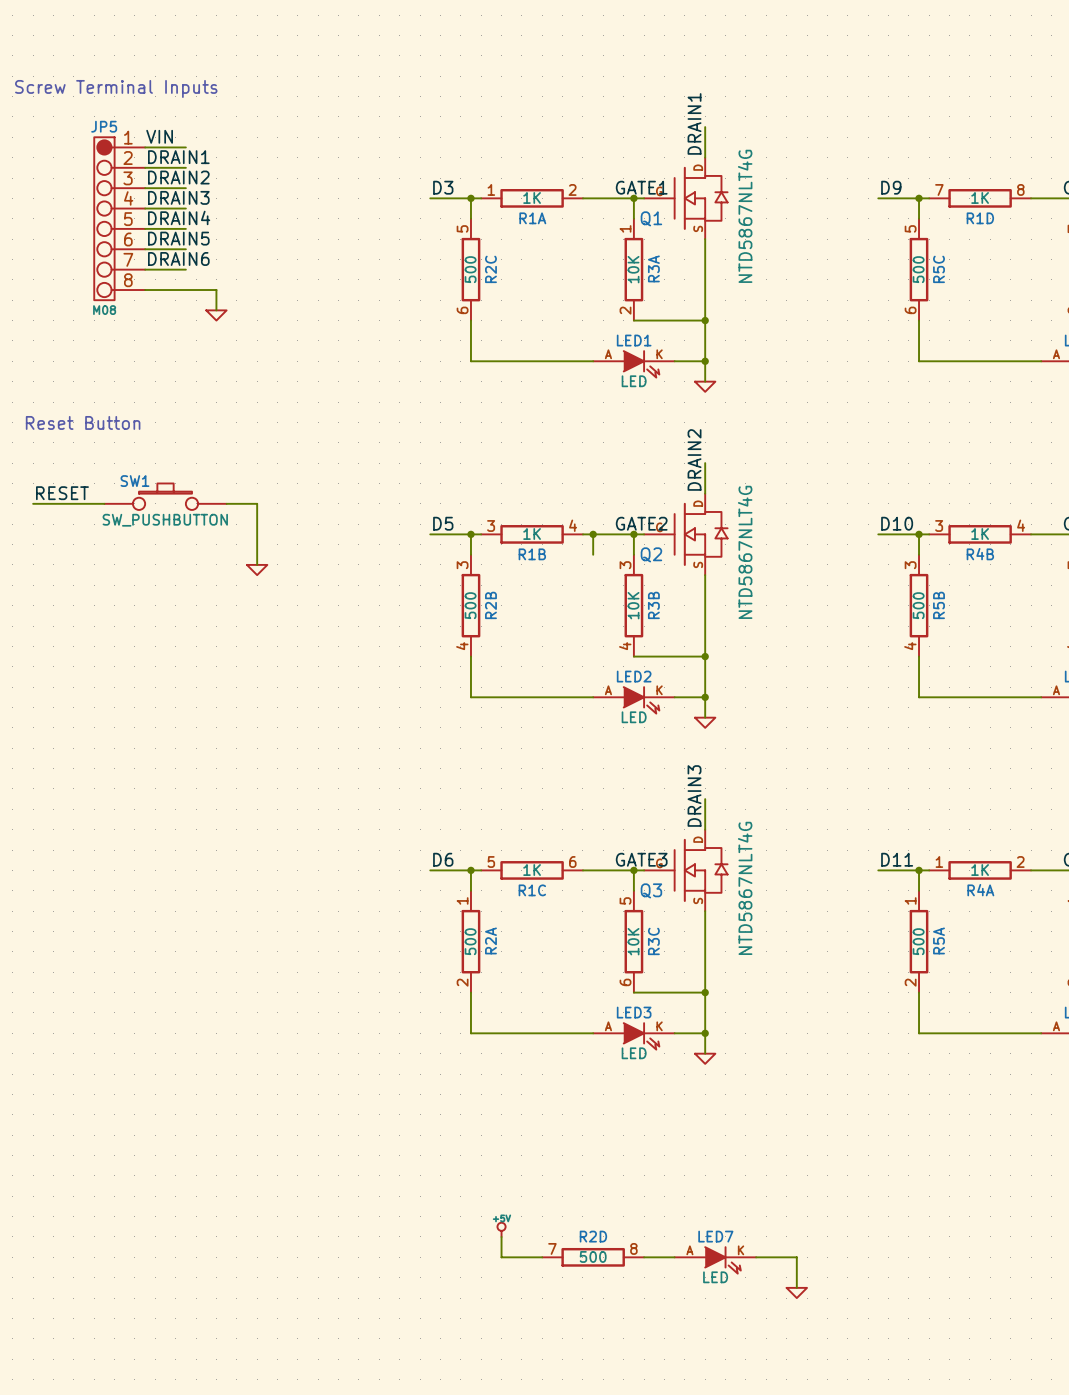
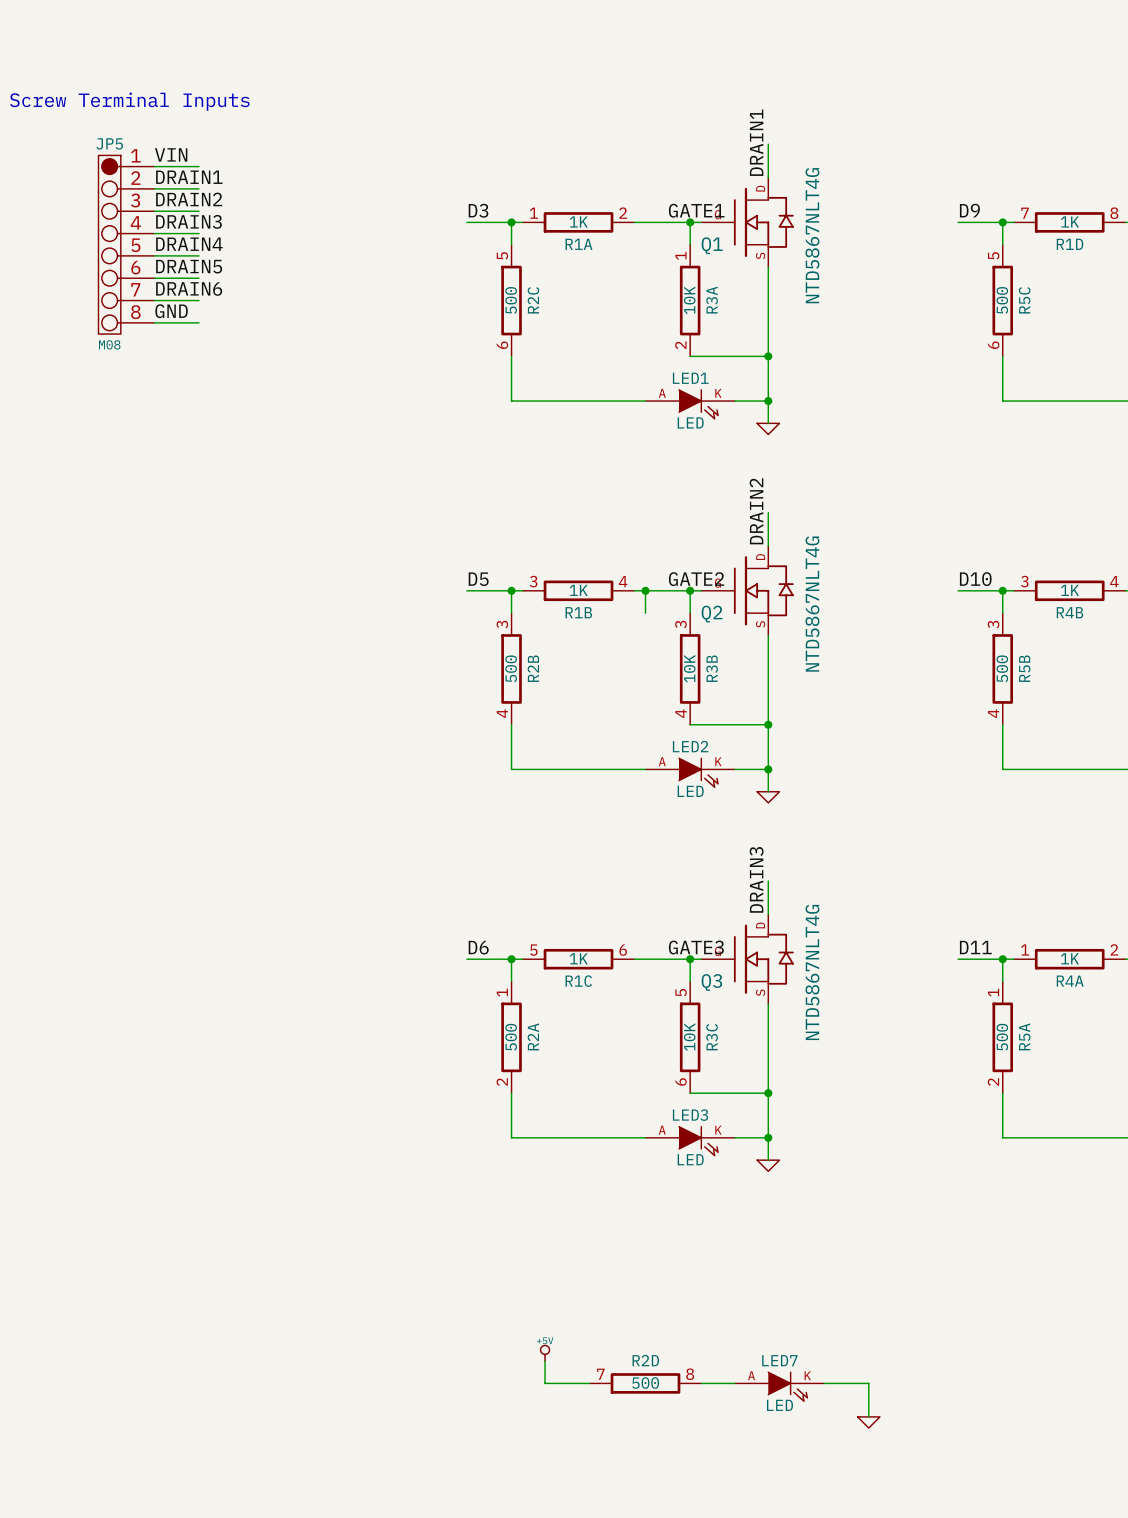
label: none -> GND (171, 311)
wire: (185, 290) (216, 290) (216, 310) -> none
power symbol: (216, 315) -> none
text: Reset Button (83, 422) -> none
label: RESET (62, 493) -> none
SW1: SW_PUSHBUTTON (165, 496) -> none
wire: (33, 503) (104, 503) -> none
wire: (226, 503) (257, 503) (257, 564) -> none
power symbol: (257, 570) -> none

